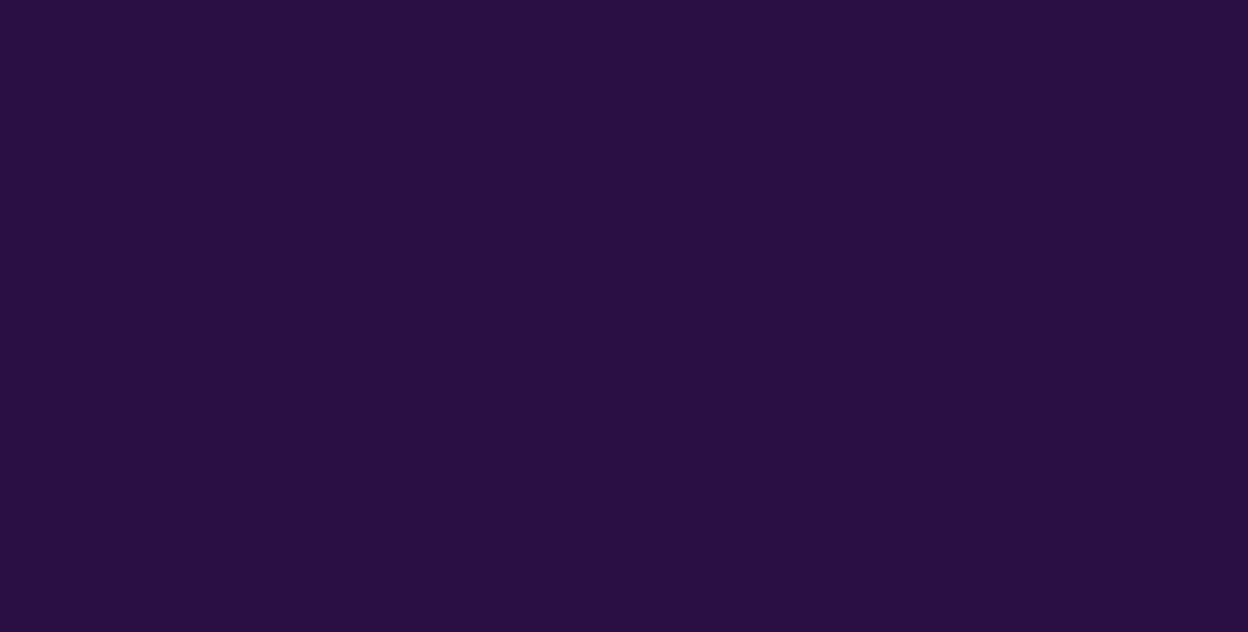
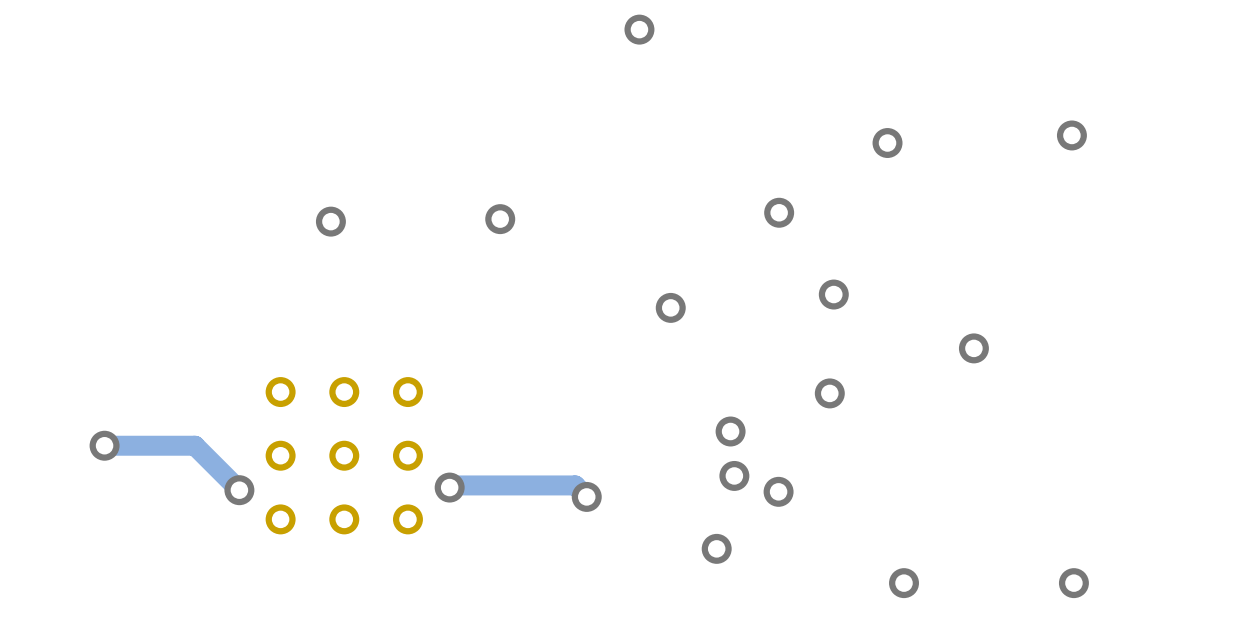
via: none -> (639, 29)
via: none -> (1071, 135)
via: none -> (887, 143)
via: none -> (779, 212)
via: none -> (500, 219)
via: none -> (330, 221)
via: none -> (833, 294)
via: none -> (670, 307)
via: none -> (973, 348)
via: none -> (829, 393)
via: none -> (730, 431)
track: none -> (104, 445) (194, 445) (239, 490)
via: none -> (104, 445)
part: none -> (344, 455)
via: none -> (734, 475)
track: none -> (450, 486) (575, 485) (586, 496)
via: none -> (449, 487)
via: none -> (239, 490)
via: none -> (778, 491)
via: none -> (586, 496)
via: none -> (716, 548)
via: none -> (904, 583)
via: none -> (1073, 583)

